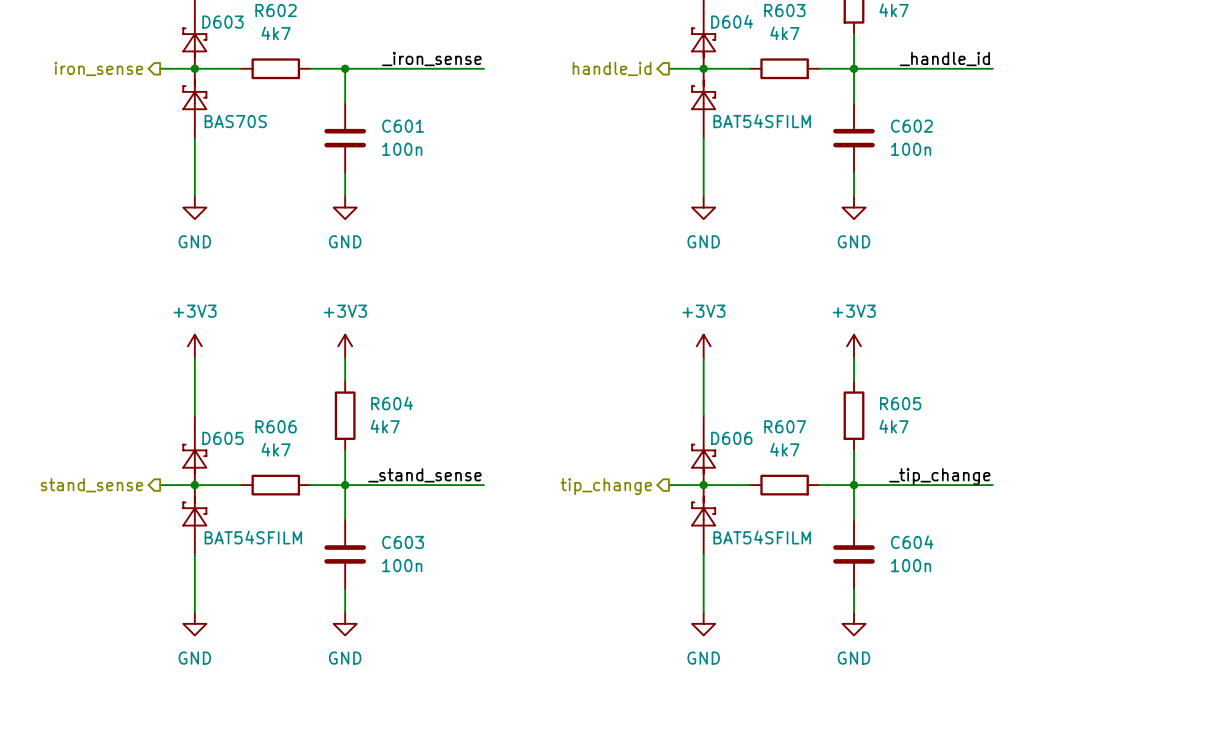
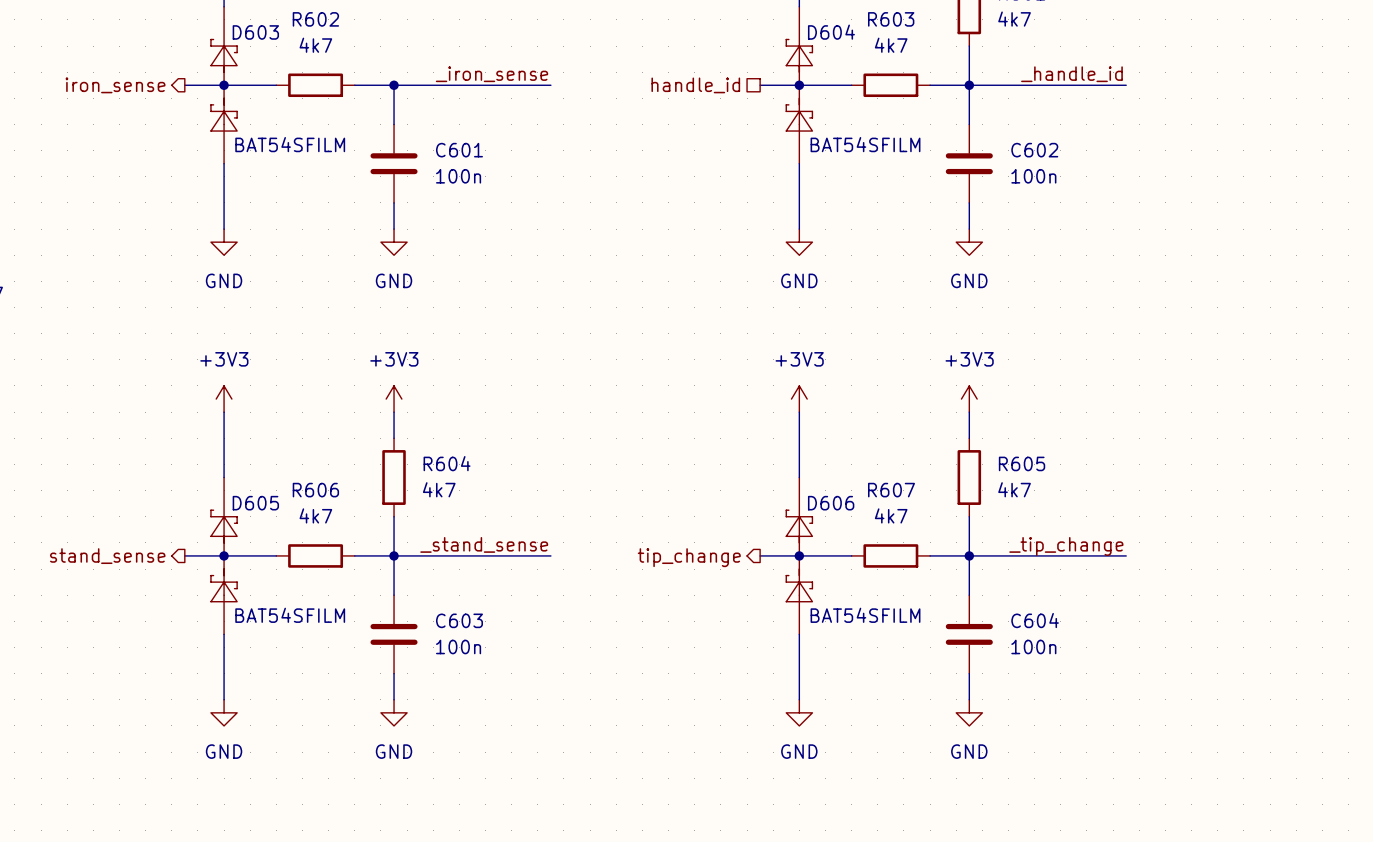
hierarchical label shape: output (612, 68) -> passive (695, 85)
D603 value: BAS70S (235, 121) -> BAT54SFILM (290, 144)

